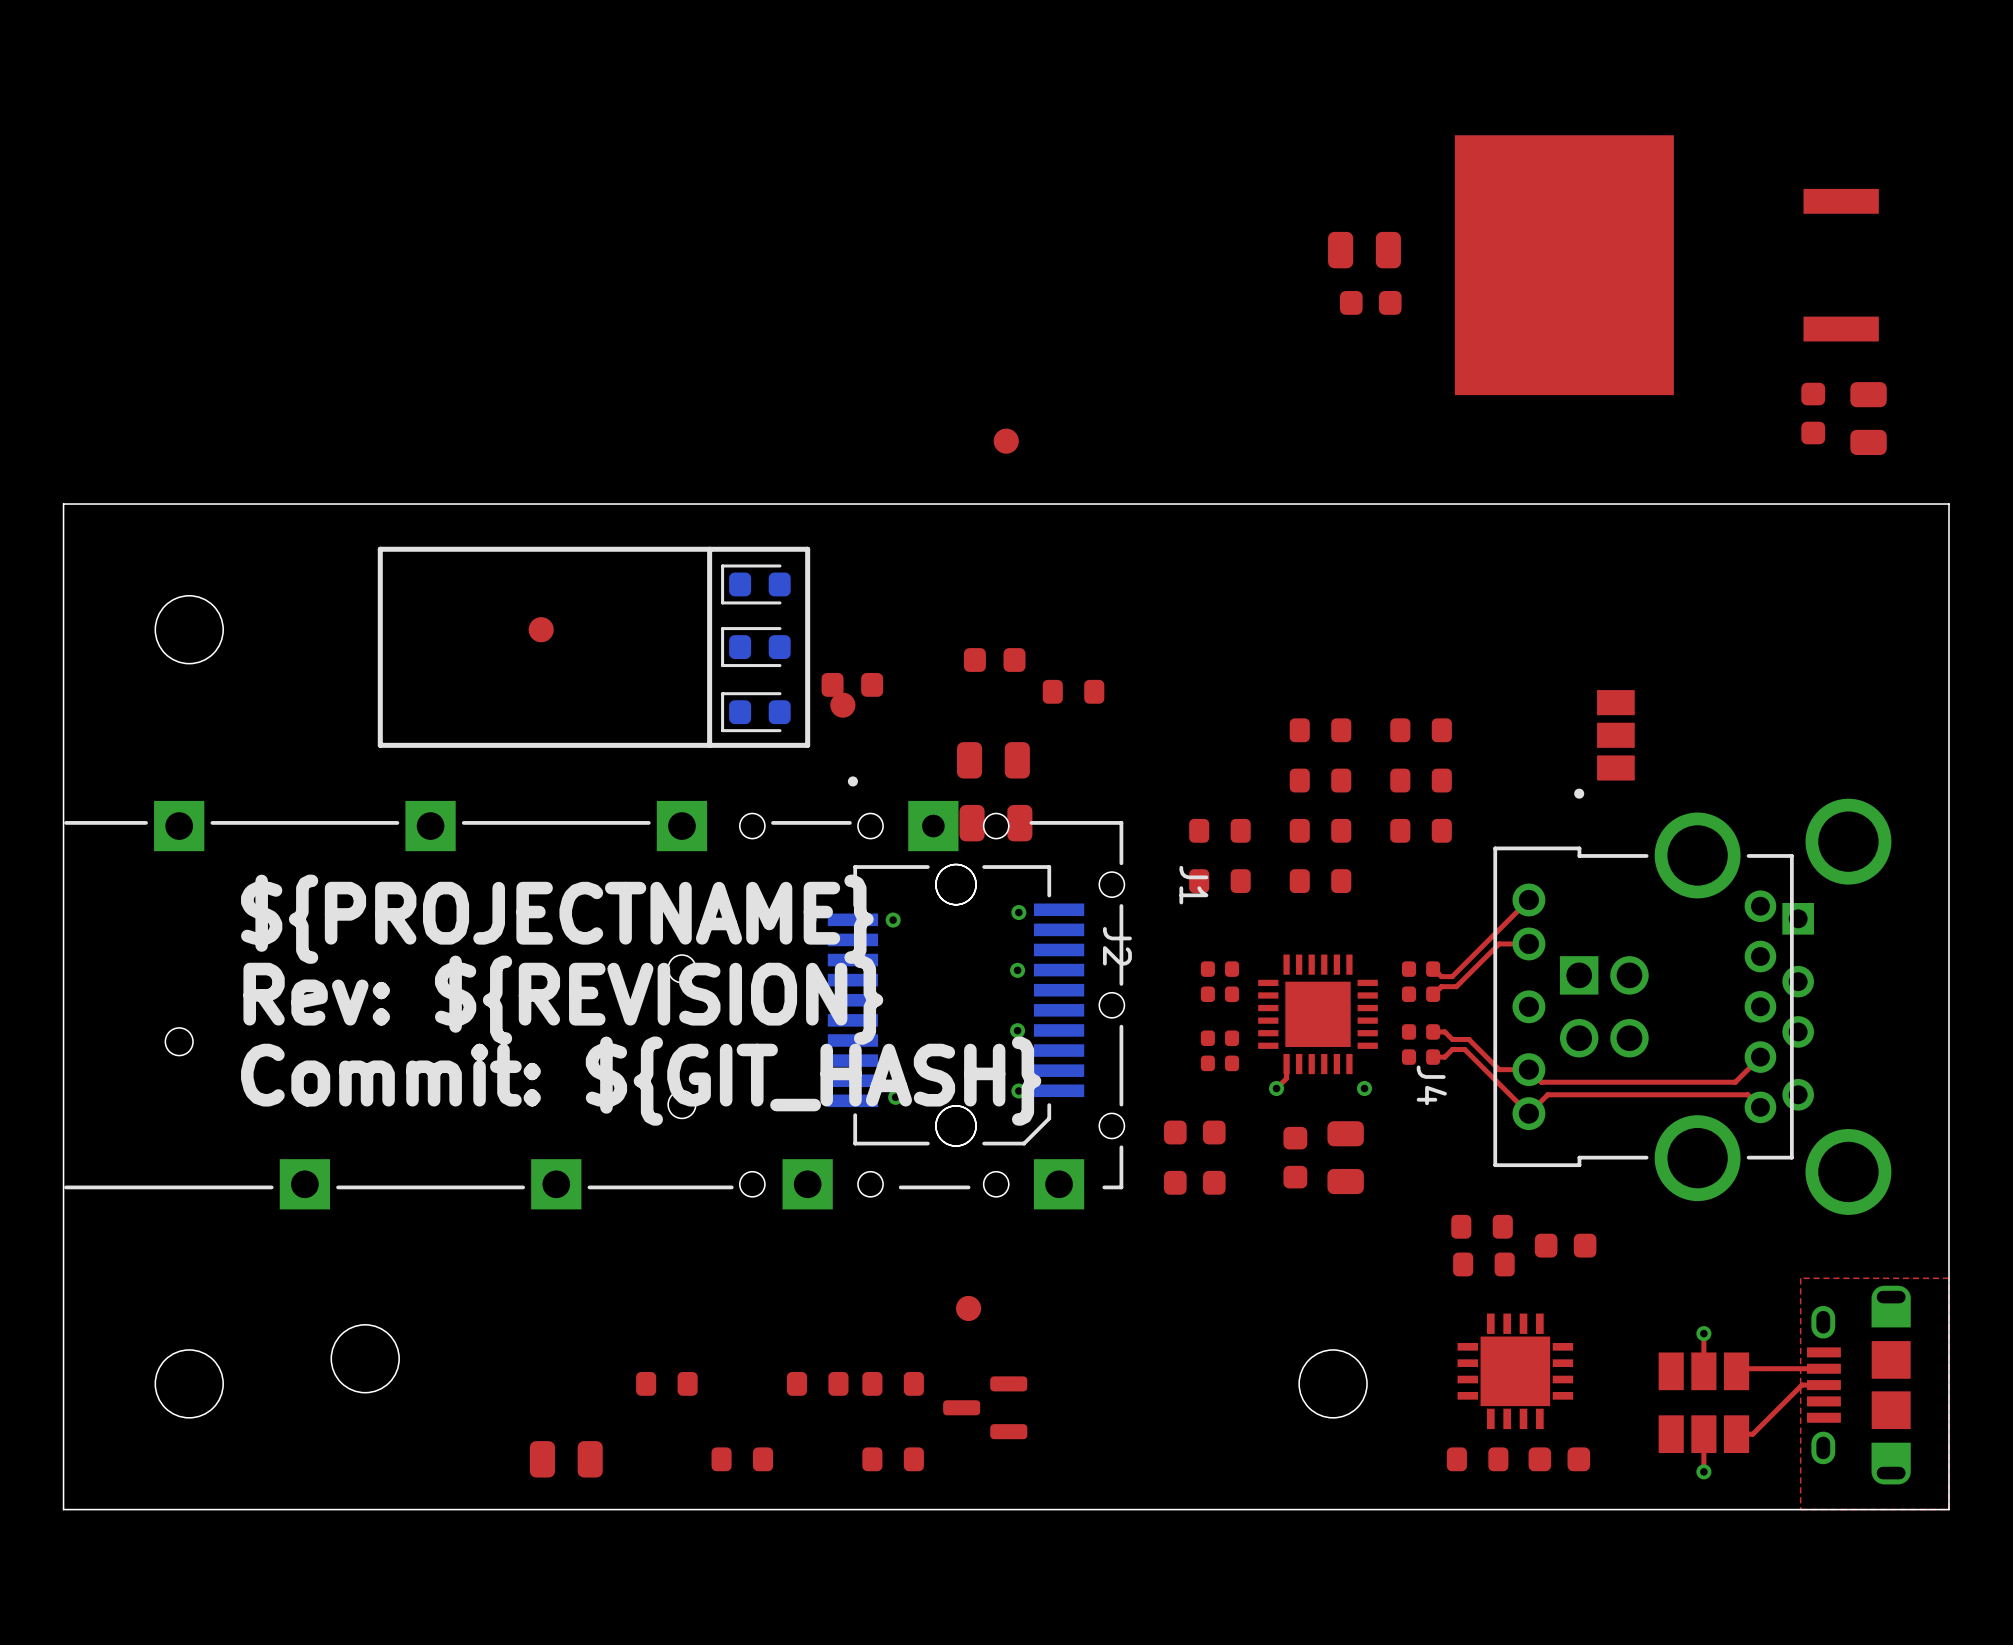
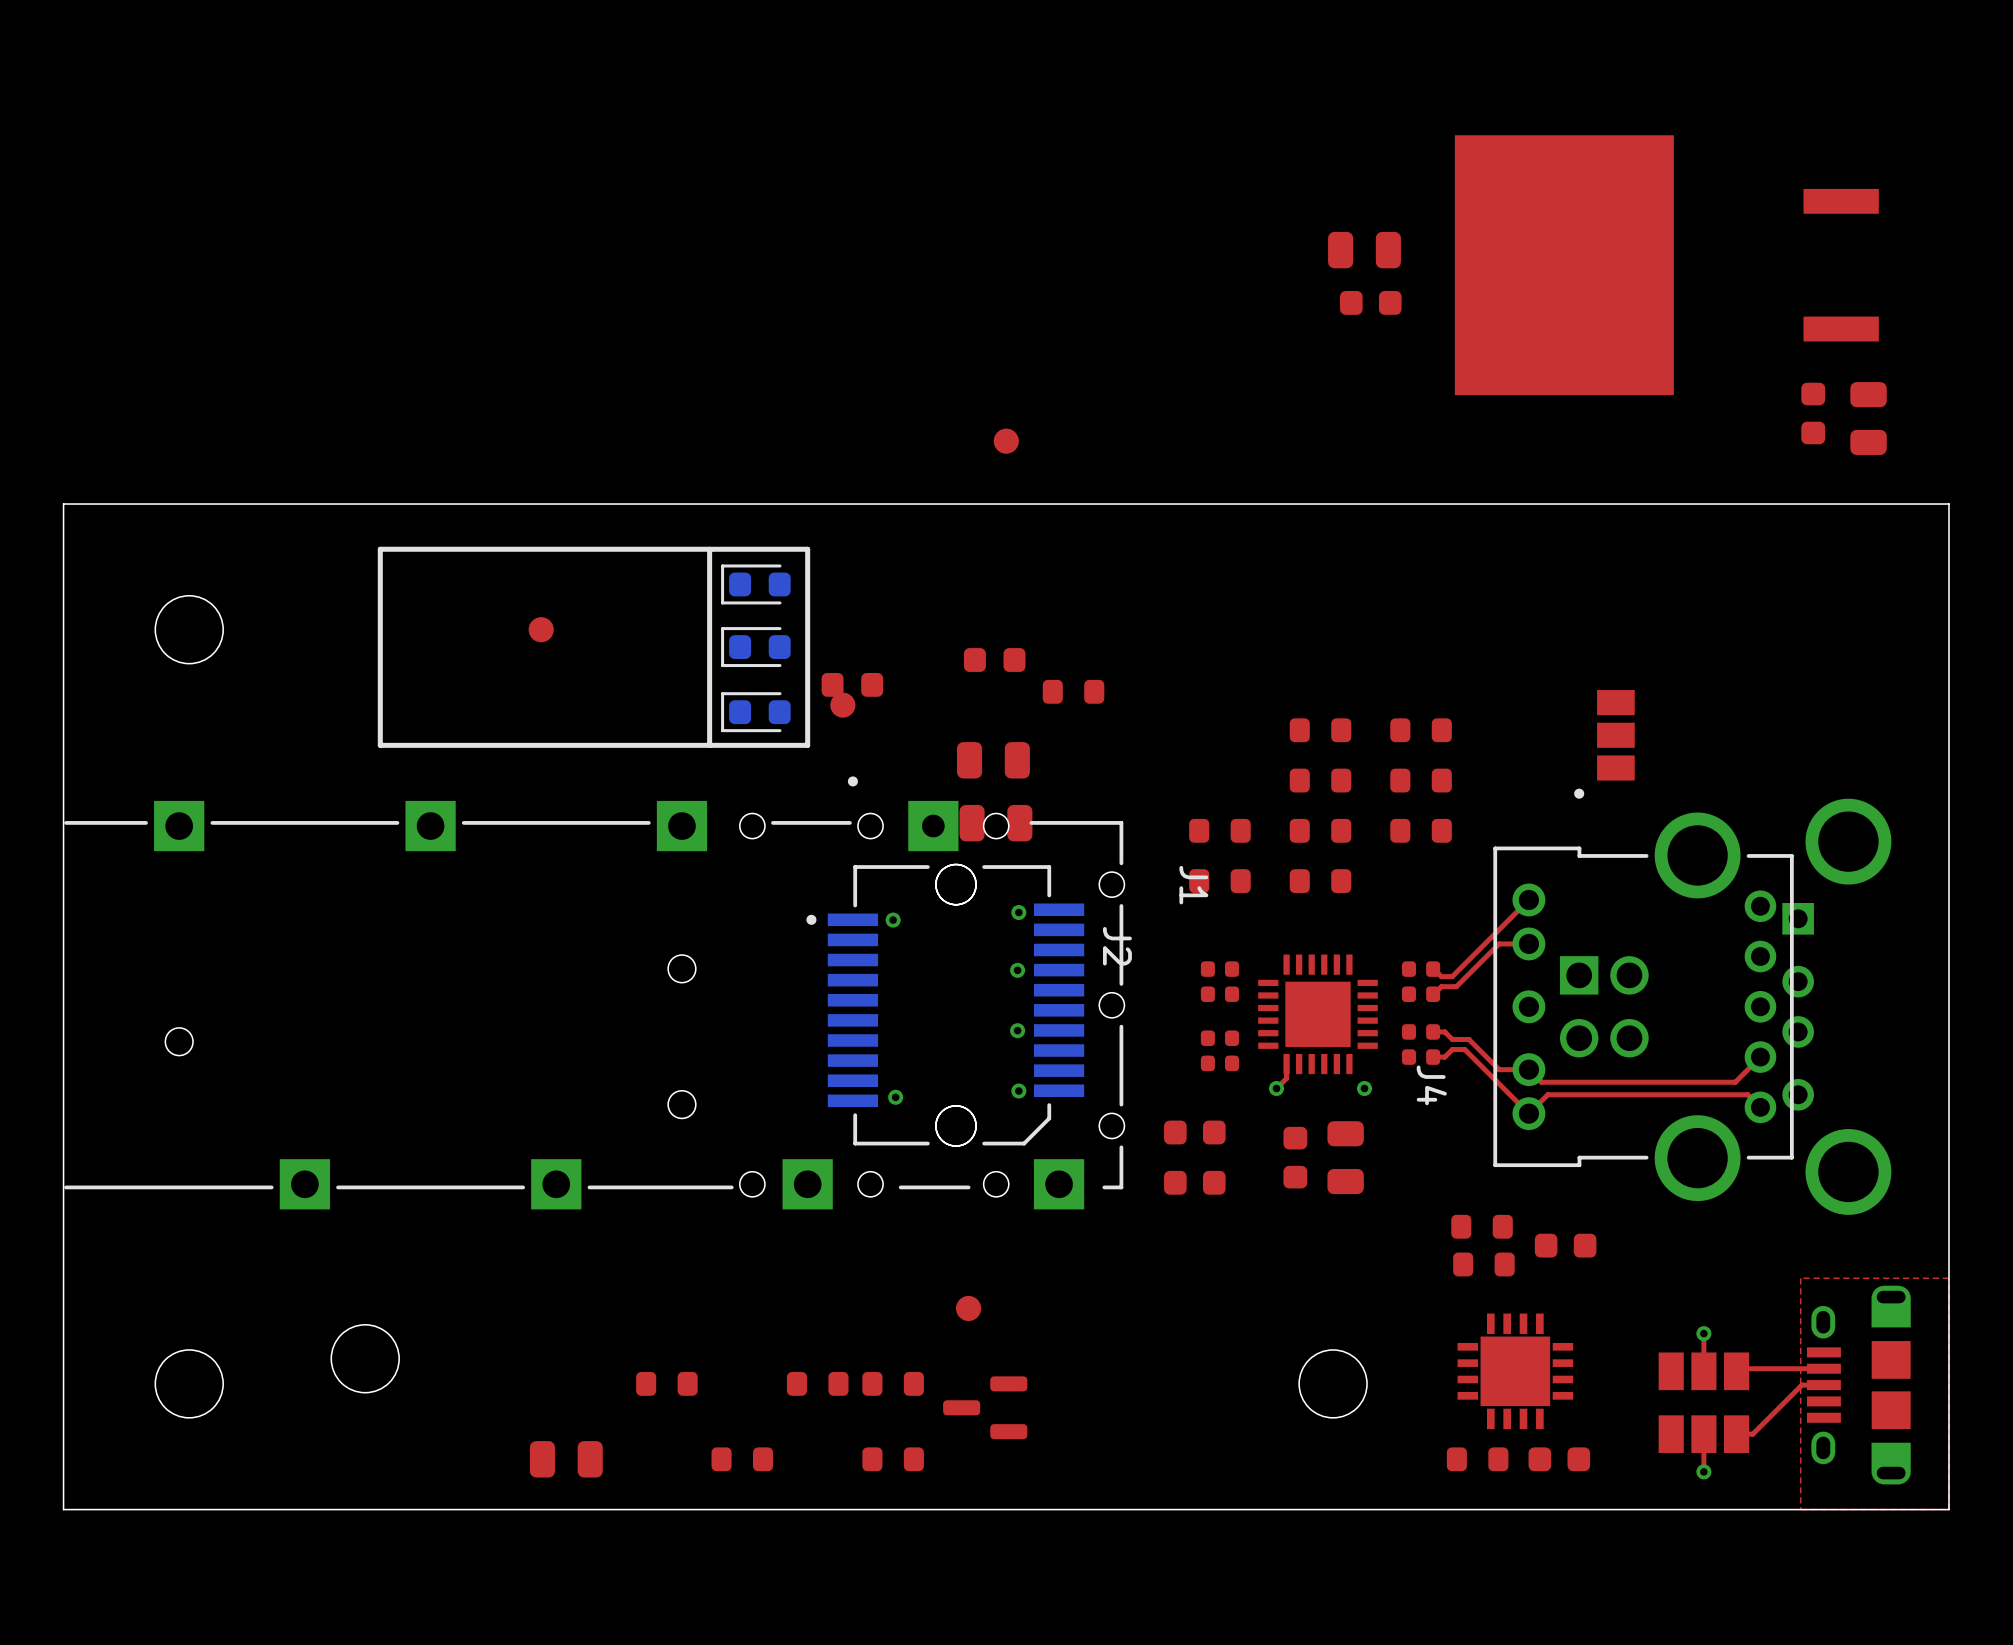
text: ${PROJECTNAME} (557, 919) -> none
text: Rev: ${REVISION} (563, 1000) -> none
text: Commit: ${GIT_HASH} (641, 1081) -> none

